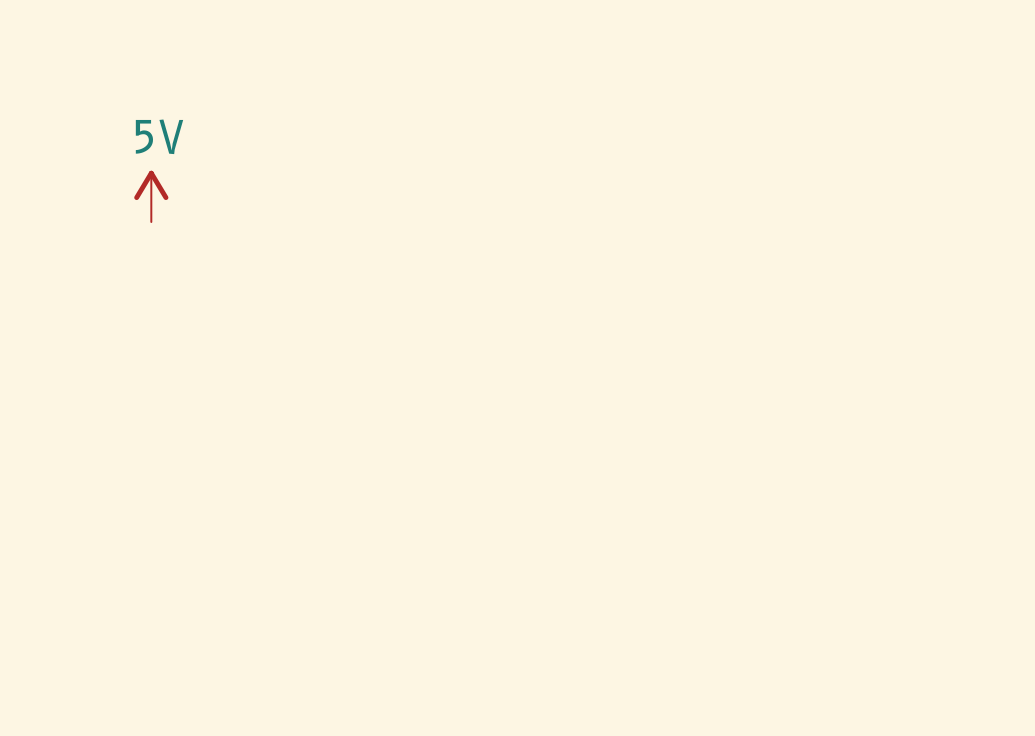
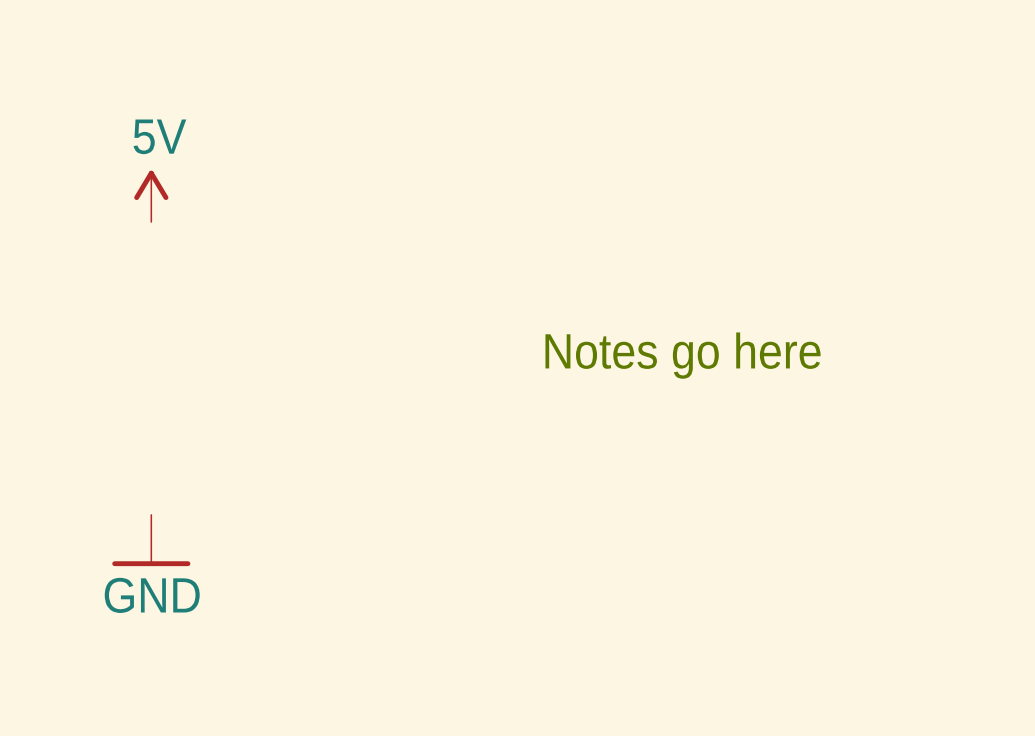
text: none -> Notes go here (683, 355)
power symbol: none -> GND (151, 540)

